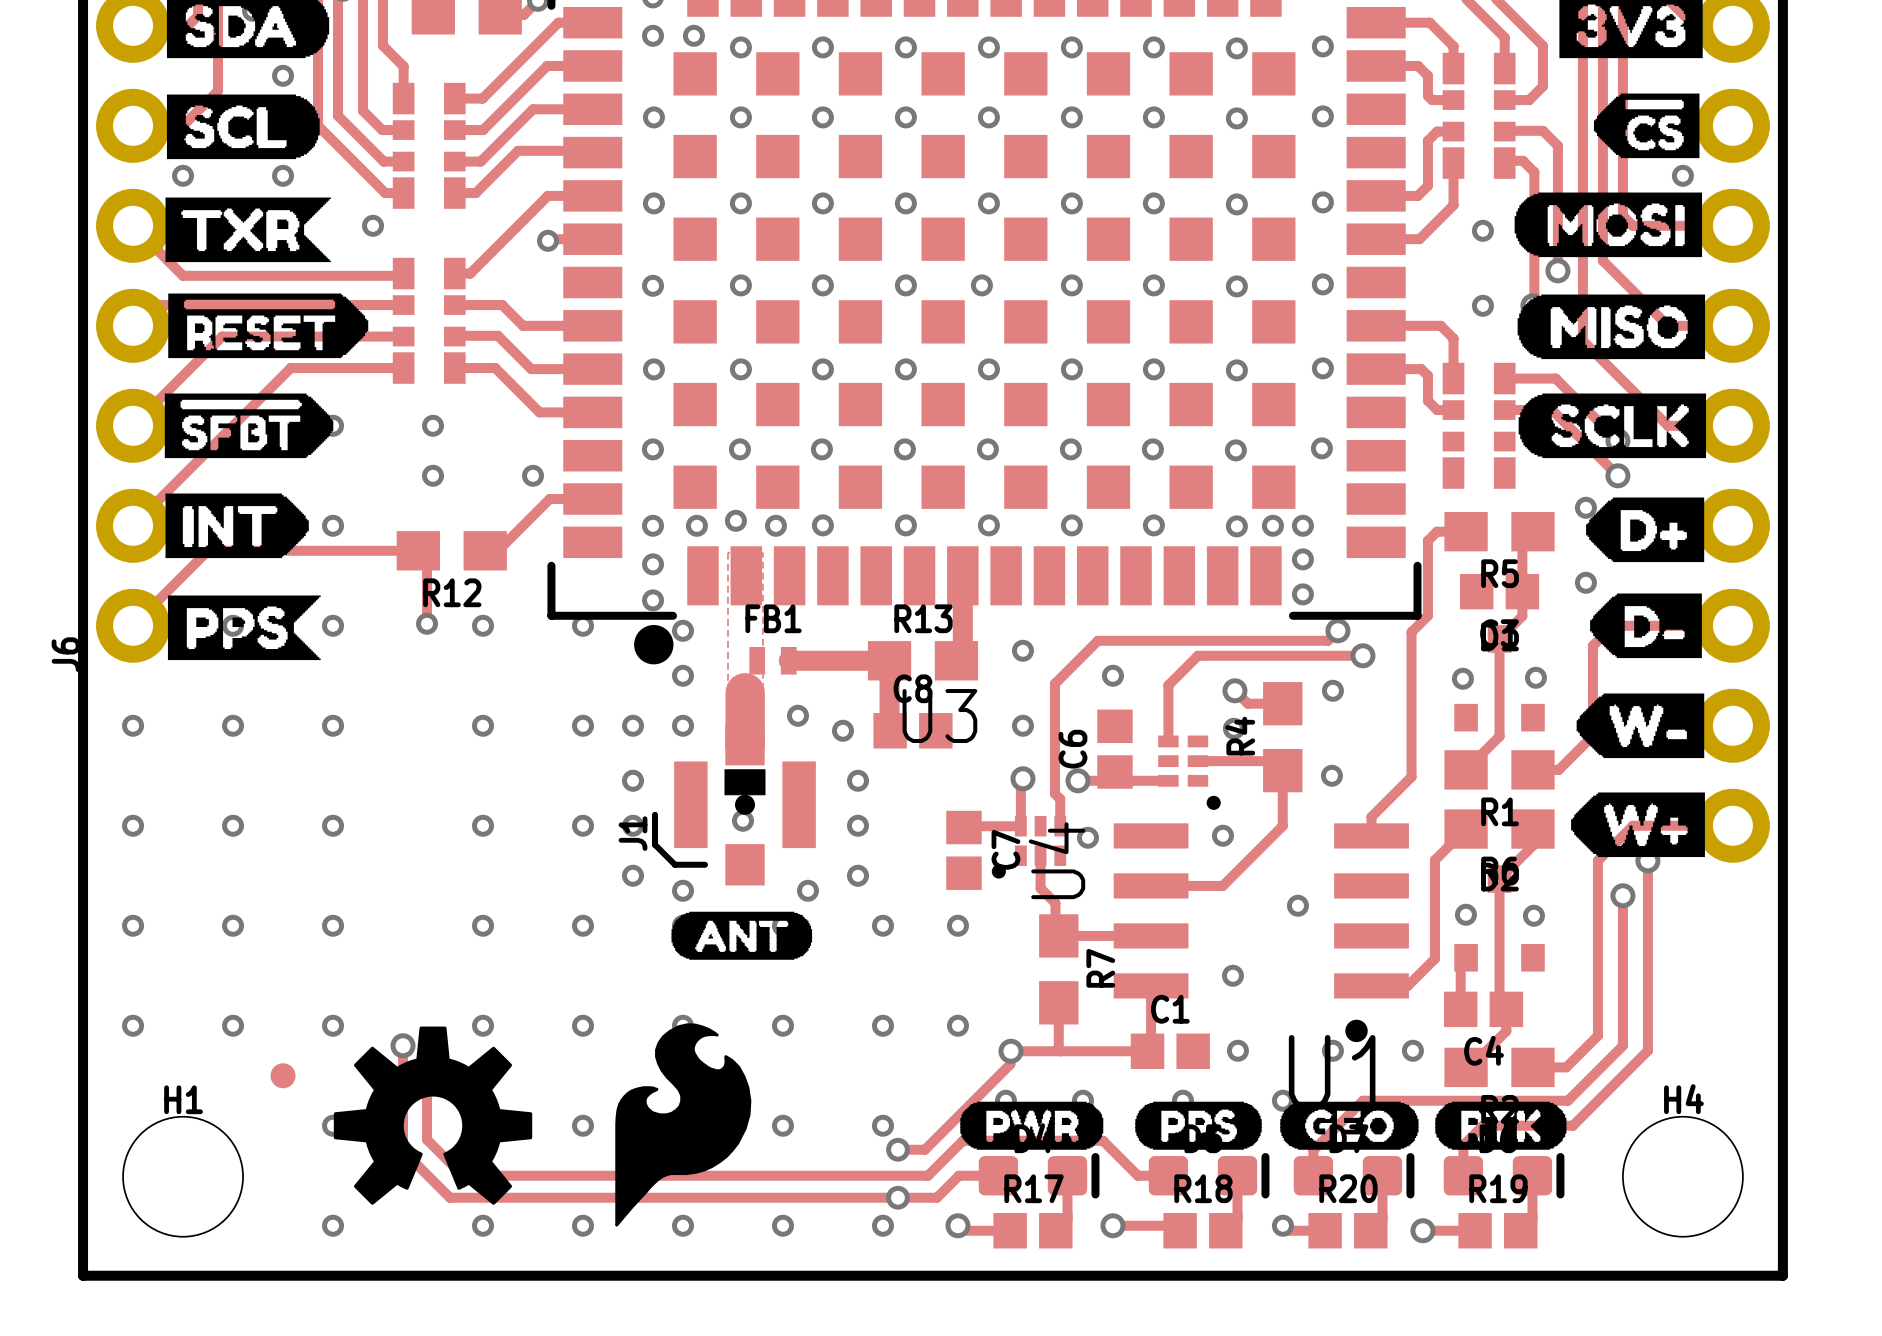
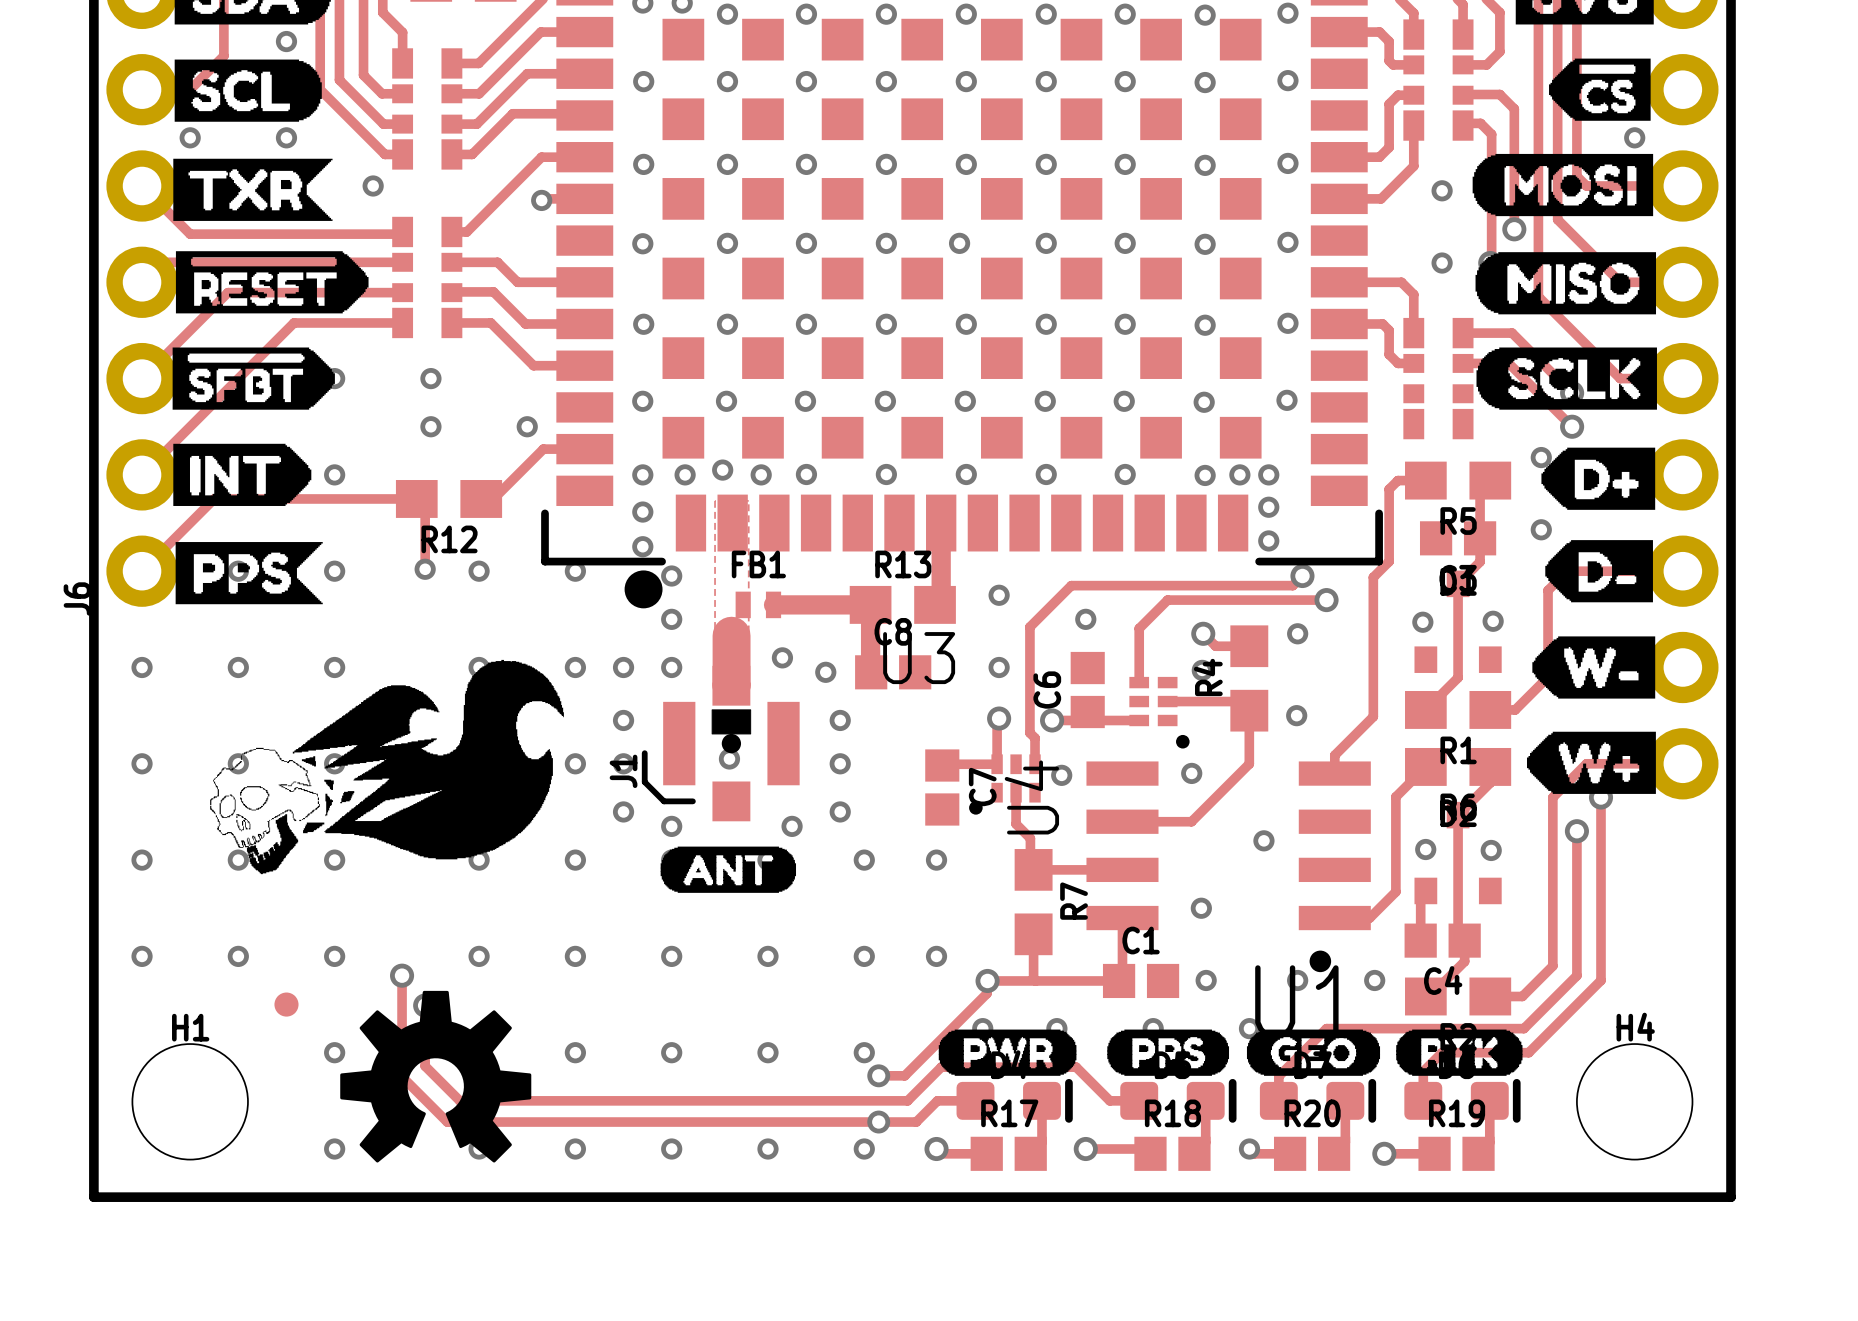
drawing: none -> [210, 659, 564, 875]
drawing: [615, 1023, 752, 1227] -> none
drawing position: (433, 1115) -> (435, 1076)

